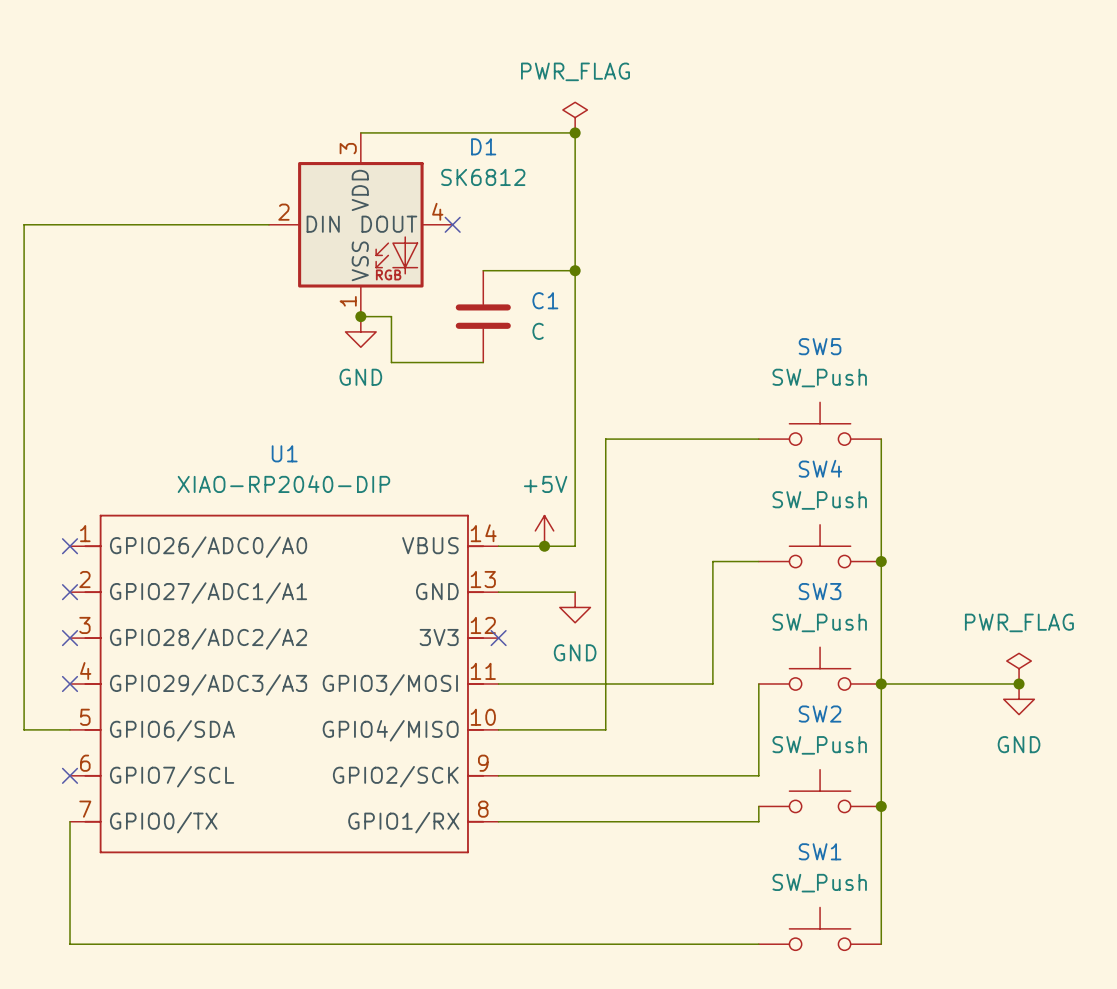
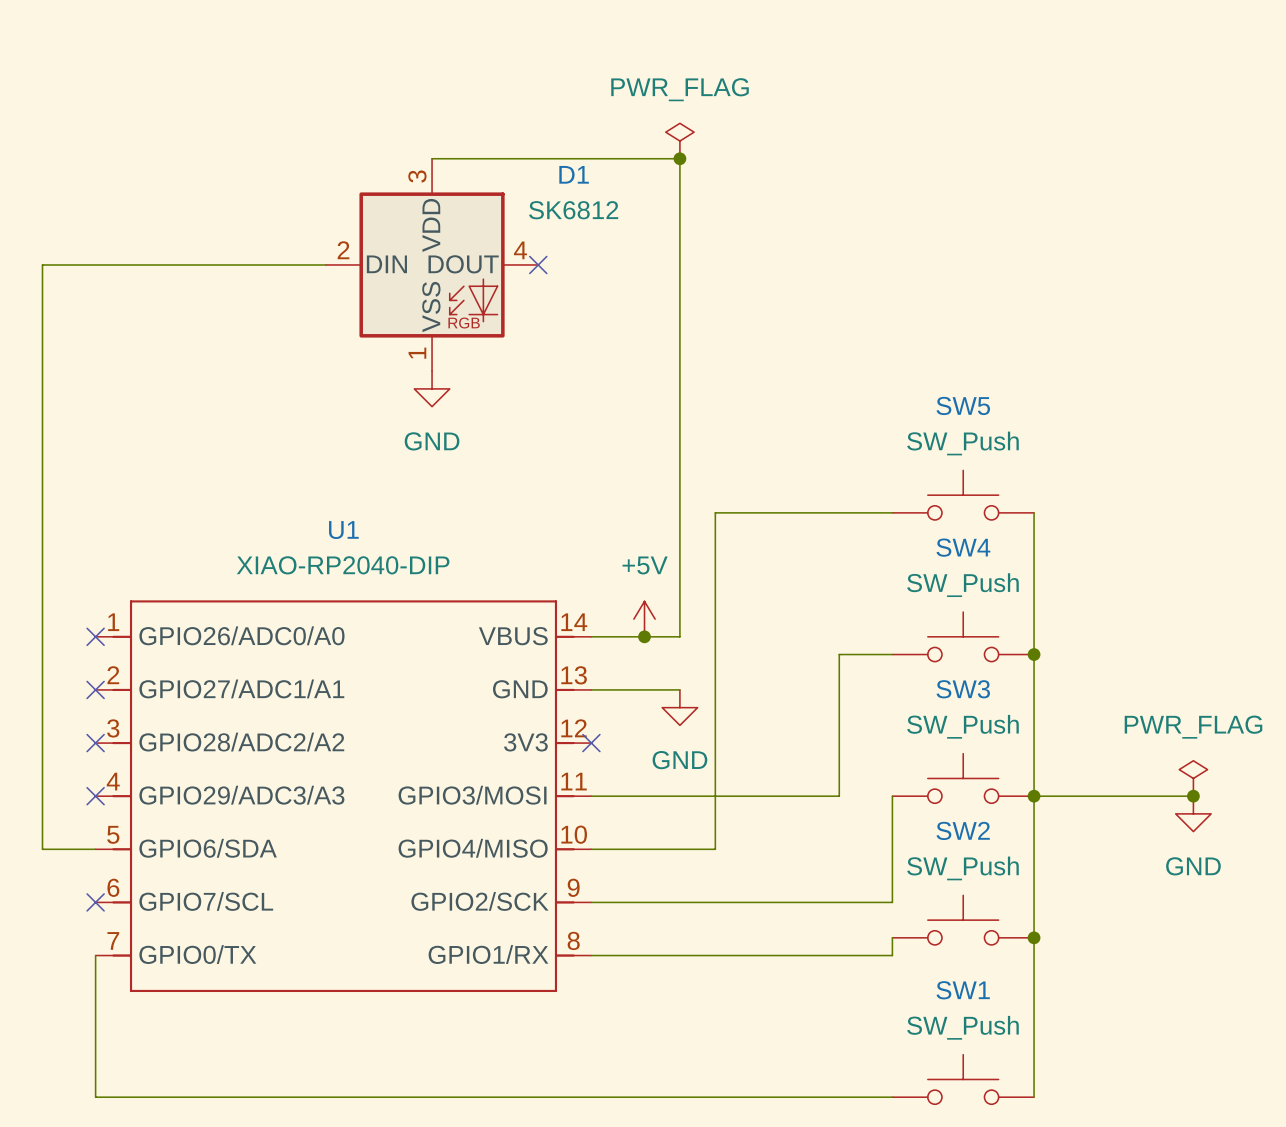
wire: (483, 270) (575, 270) -> none
junction: (575, 270) -> none
wire: (360, 316) (391, 316) (391, 362) (483, 362) -> none
junction: (360, 316) -> none
C1: C (483, 316) -> none

